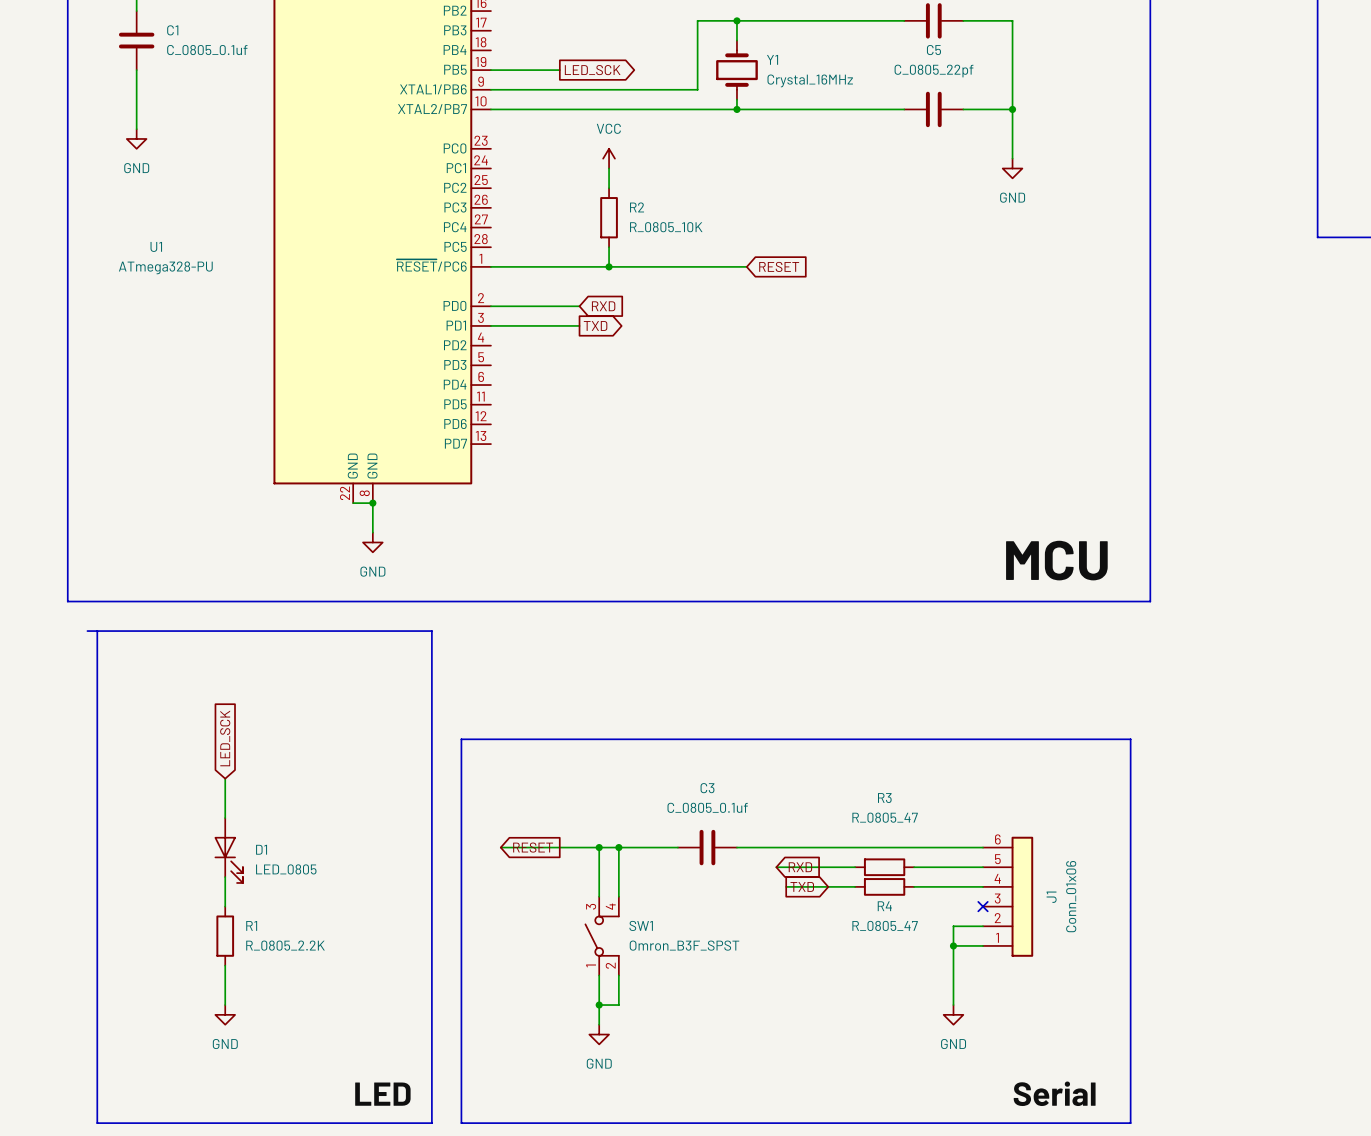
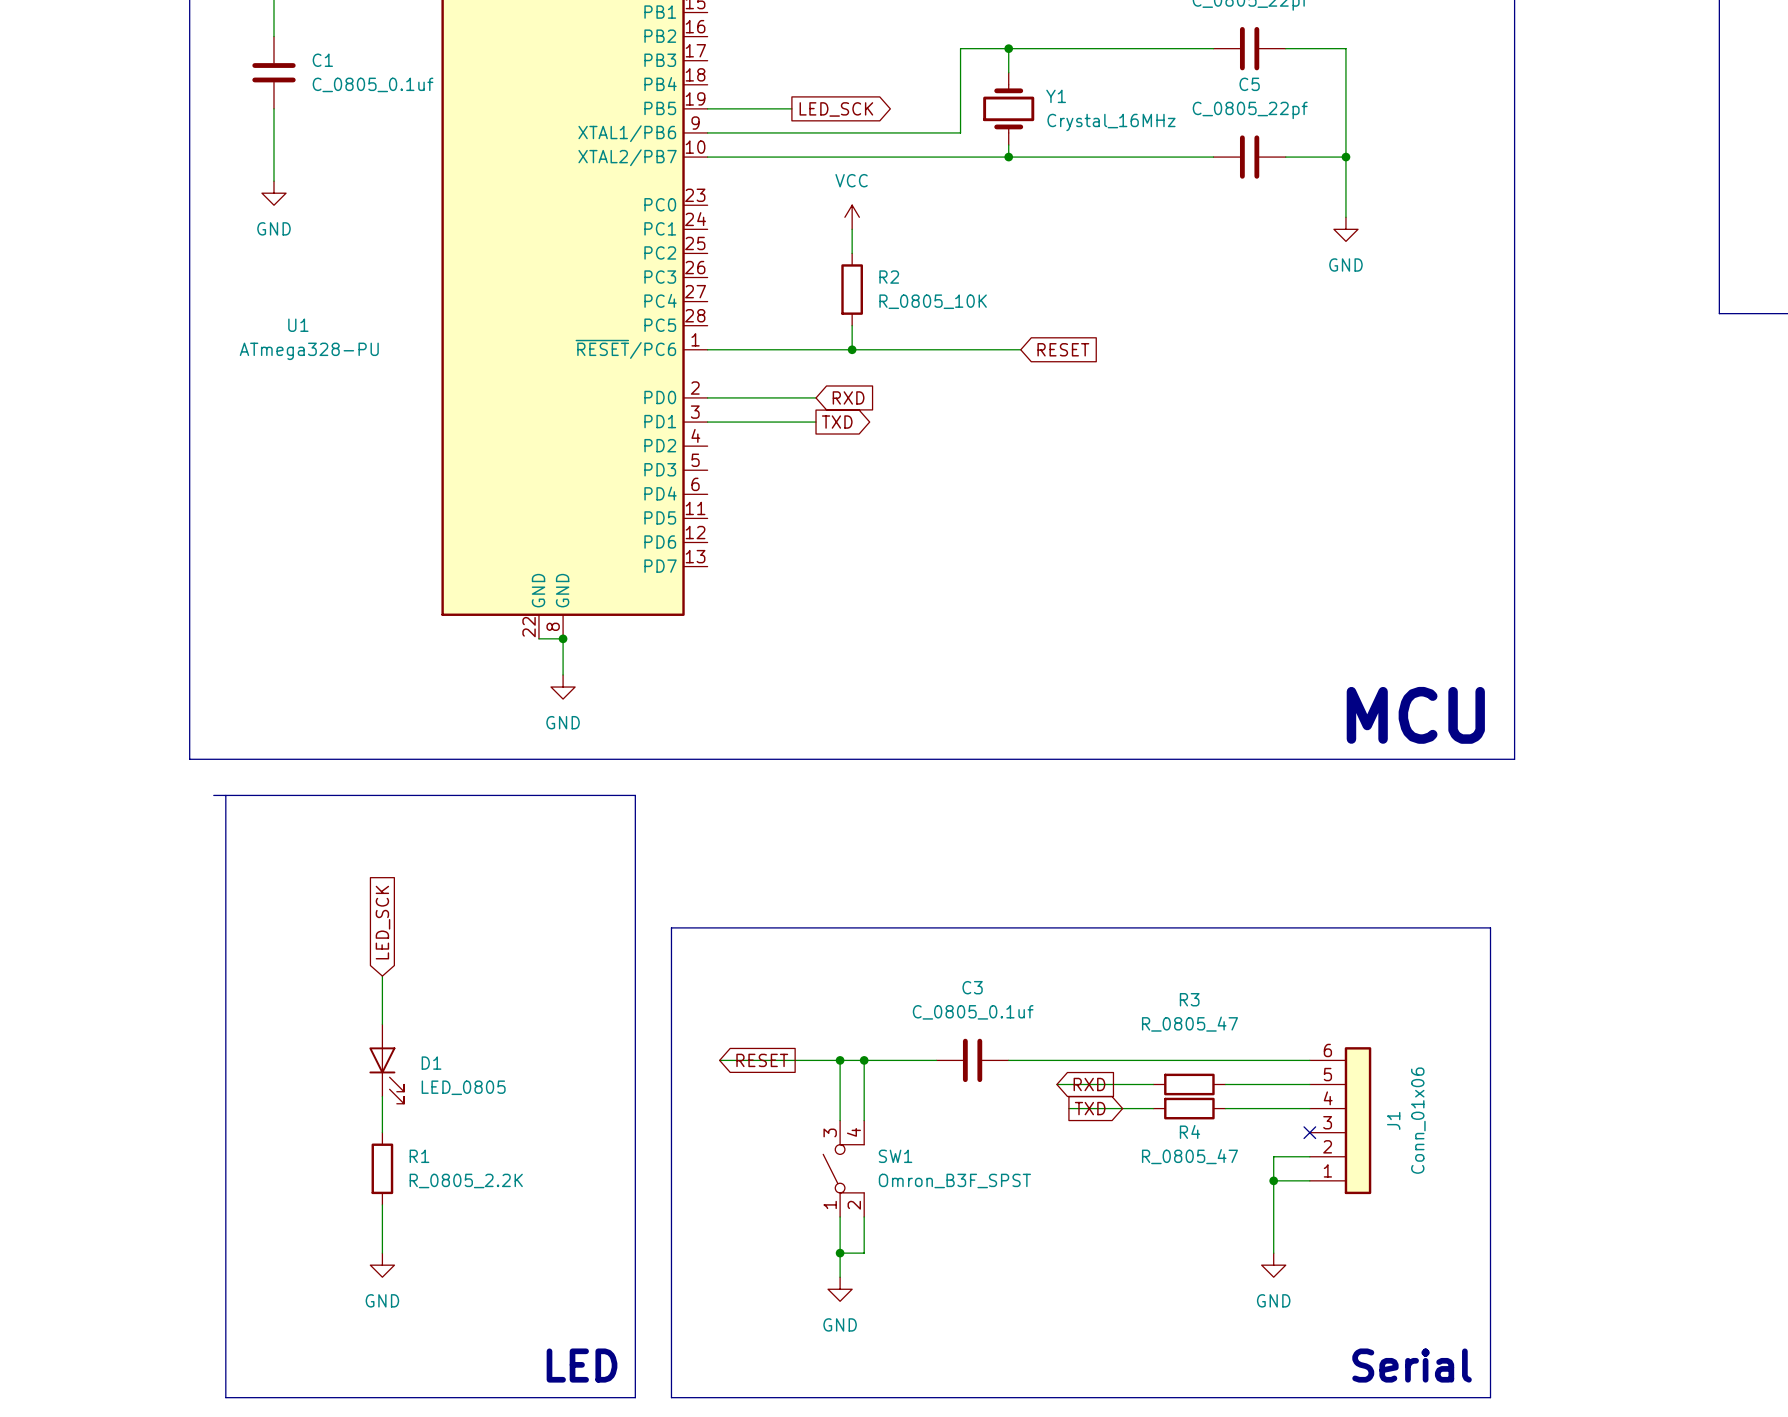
label: MCU (1056, 560) -> none
text: none -> MCU (1415, 715)
label: Serial (1054, 1093) -> none
label: LED (382, 1094) -> none
text: none -> LED (582, 1365)
text: none -> Serial (1412, 1365)

